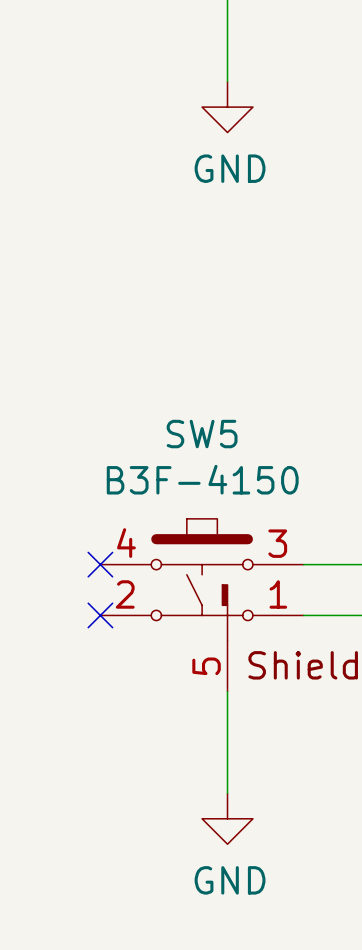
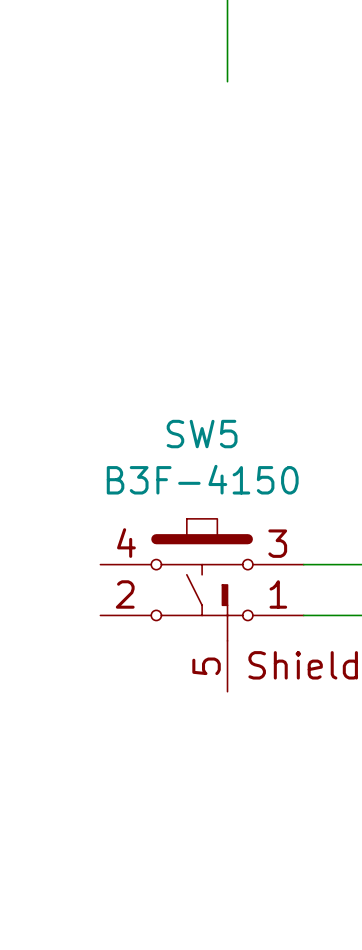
power symbol: GND (227, 107) -> none
no-connect mark: (100, 564) -> none
no-connect mark: (100, 615) -> none
wire: (227, 691) (227, 793) -> none
power symbol: GND (227, 818) -> none

